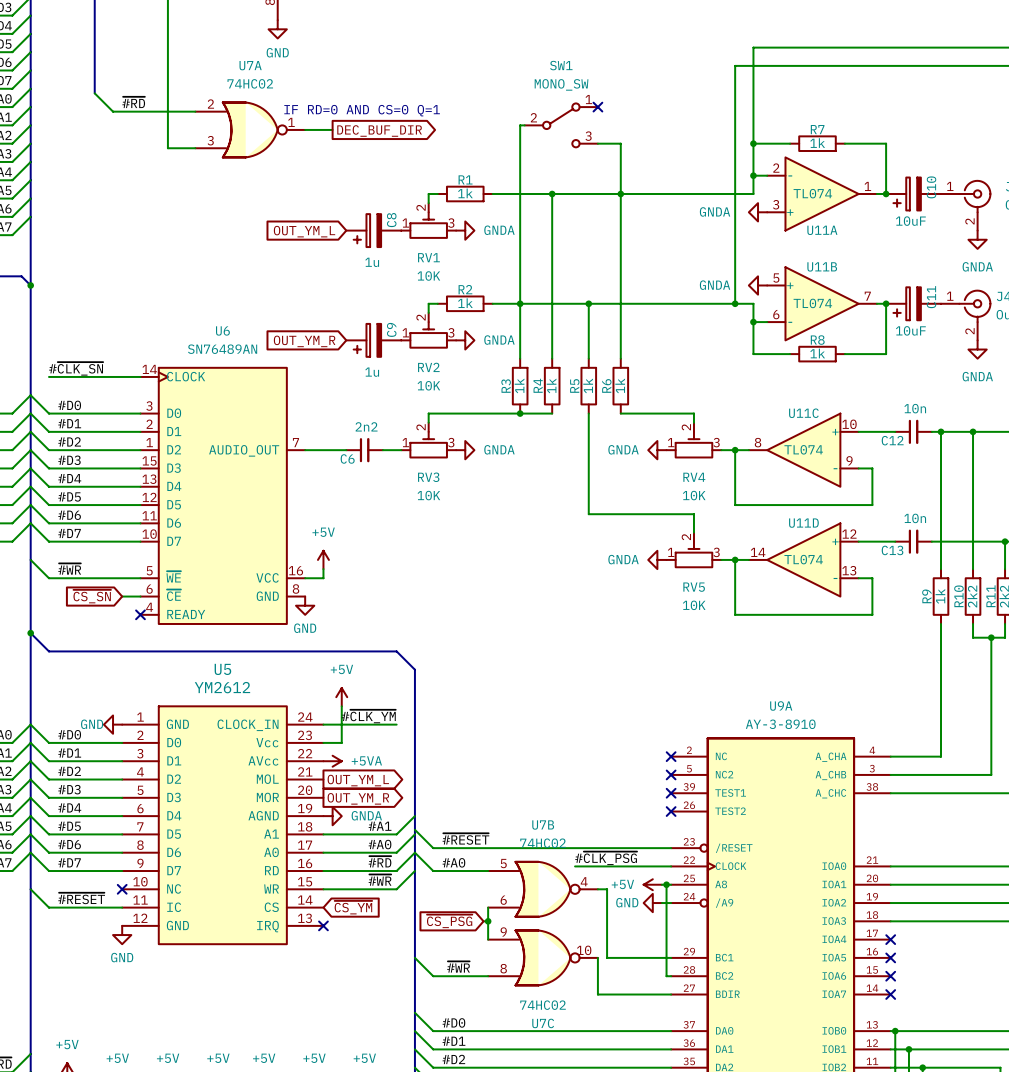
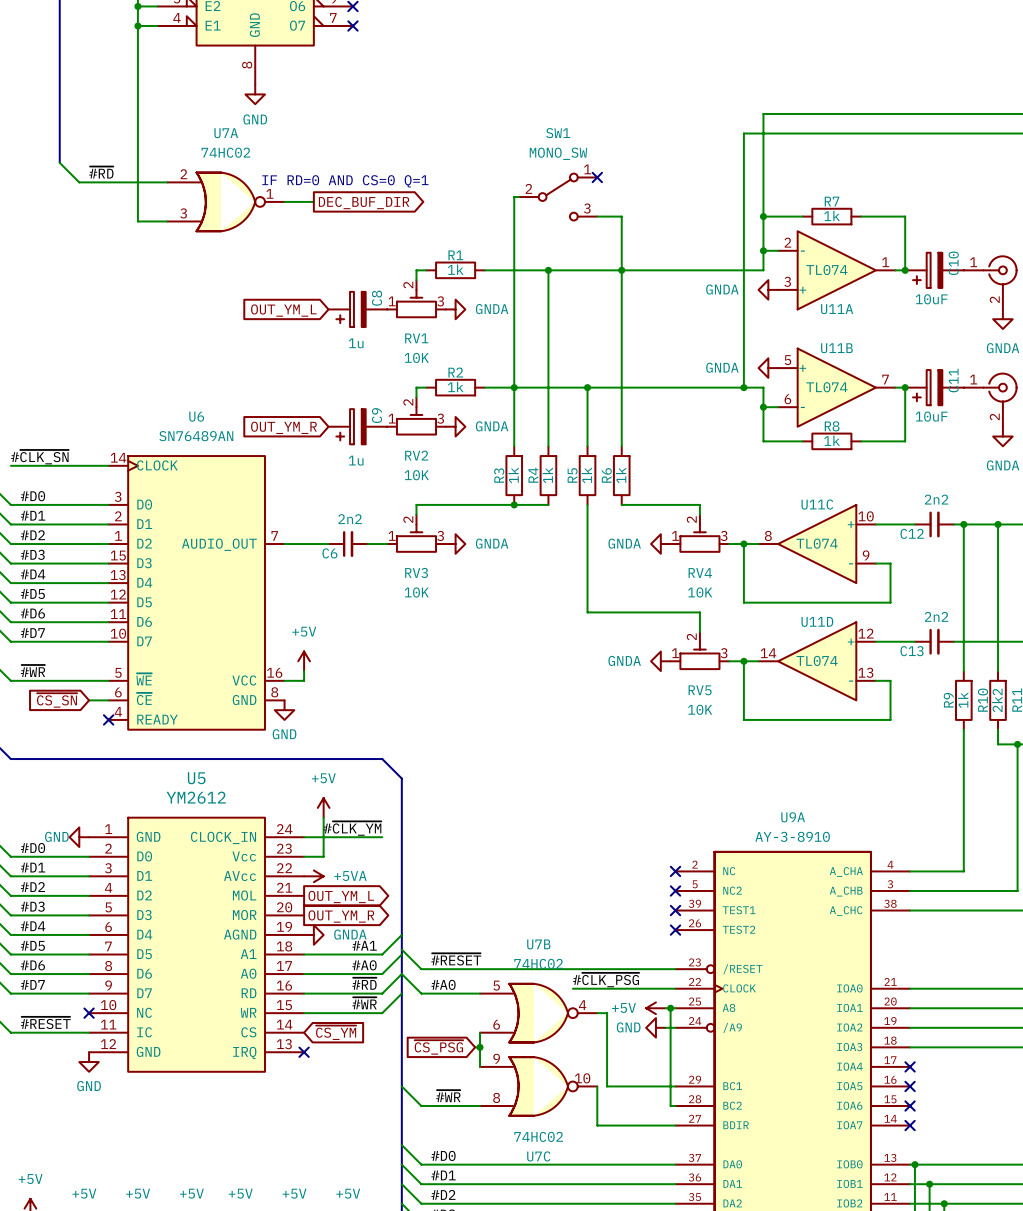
C12 value: 10n (915, 408) -> 2n2 (936, 499)
C13 value: 10n (915, 518) -> 2n2 (936, 616)

